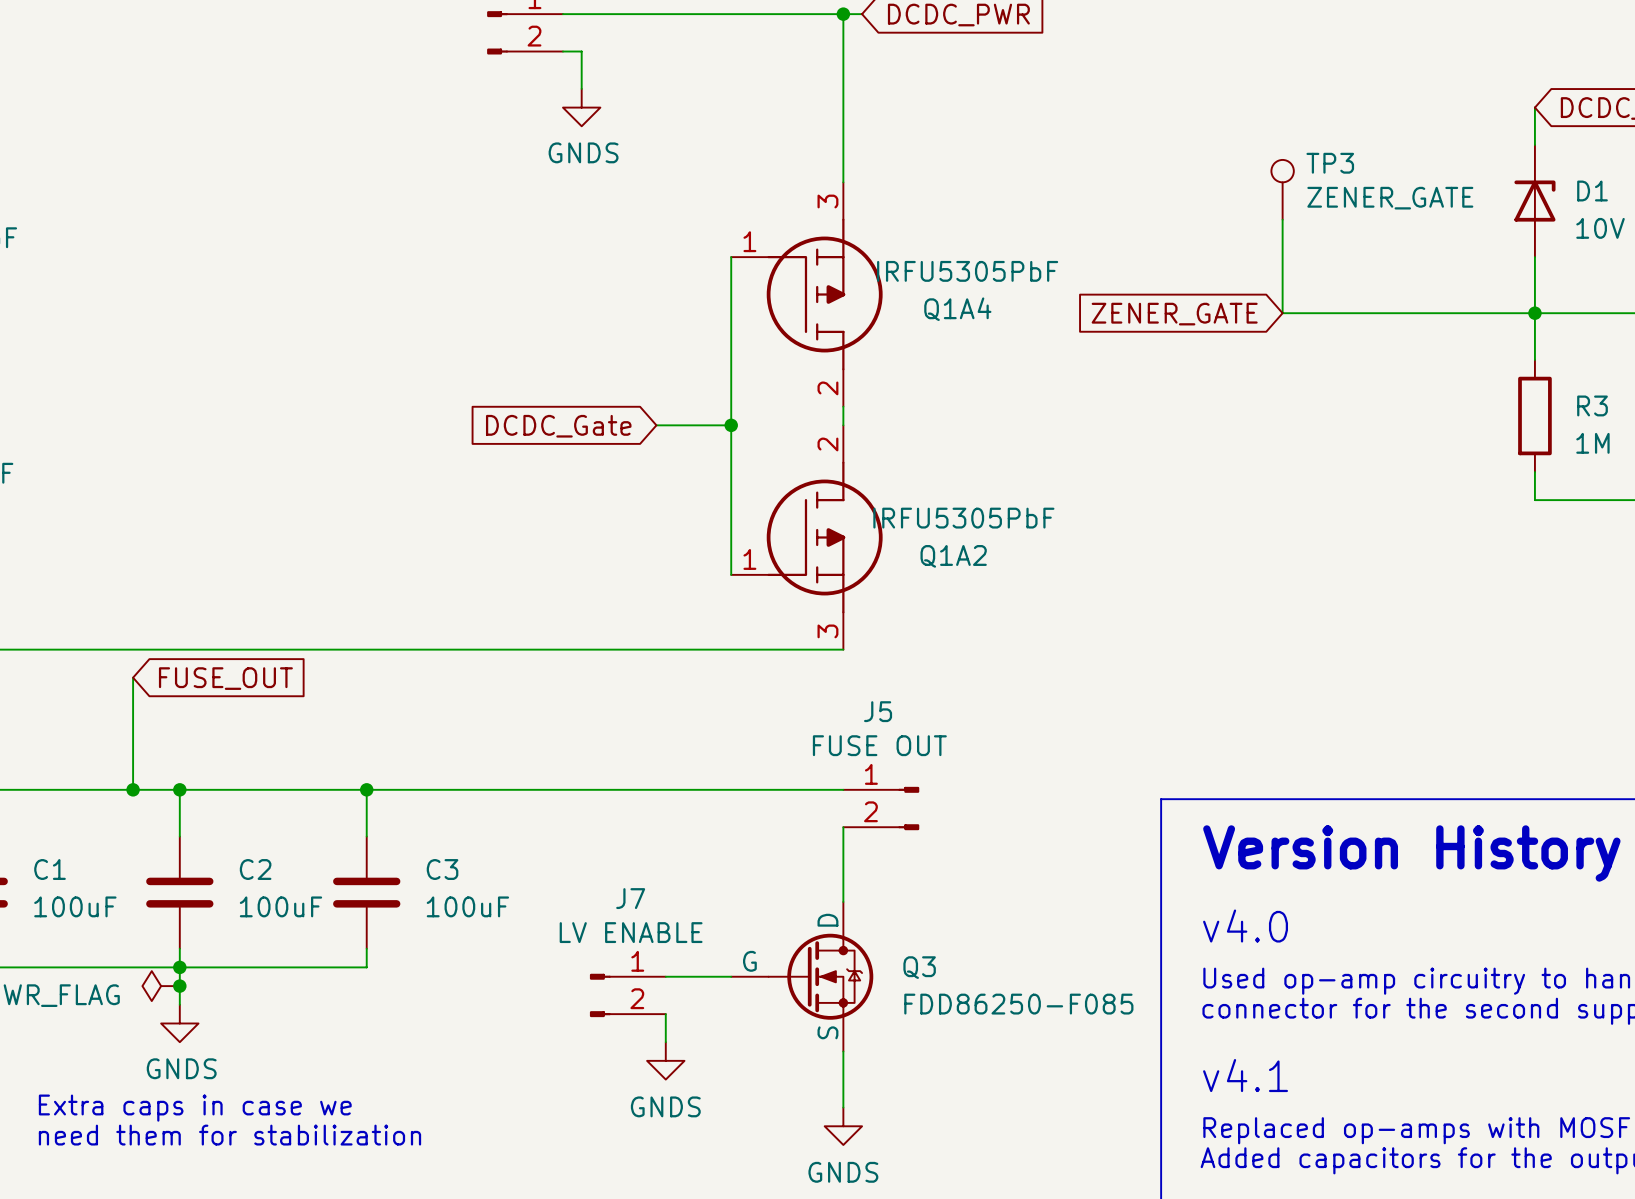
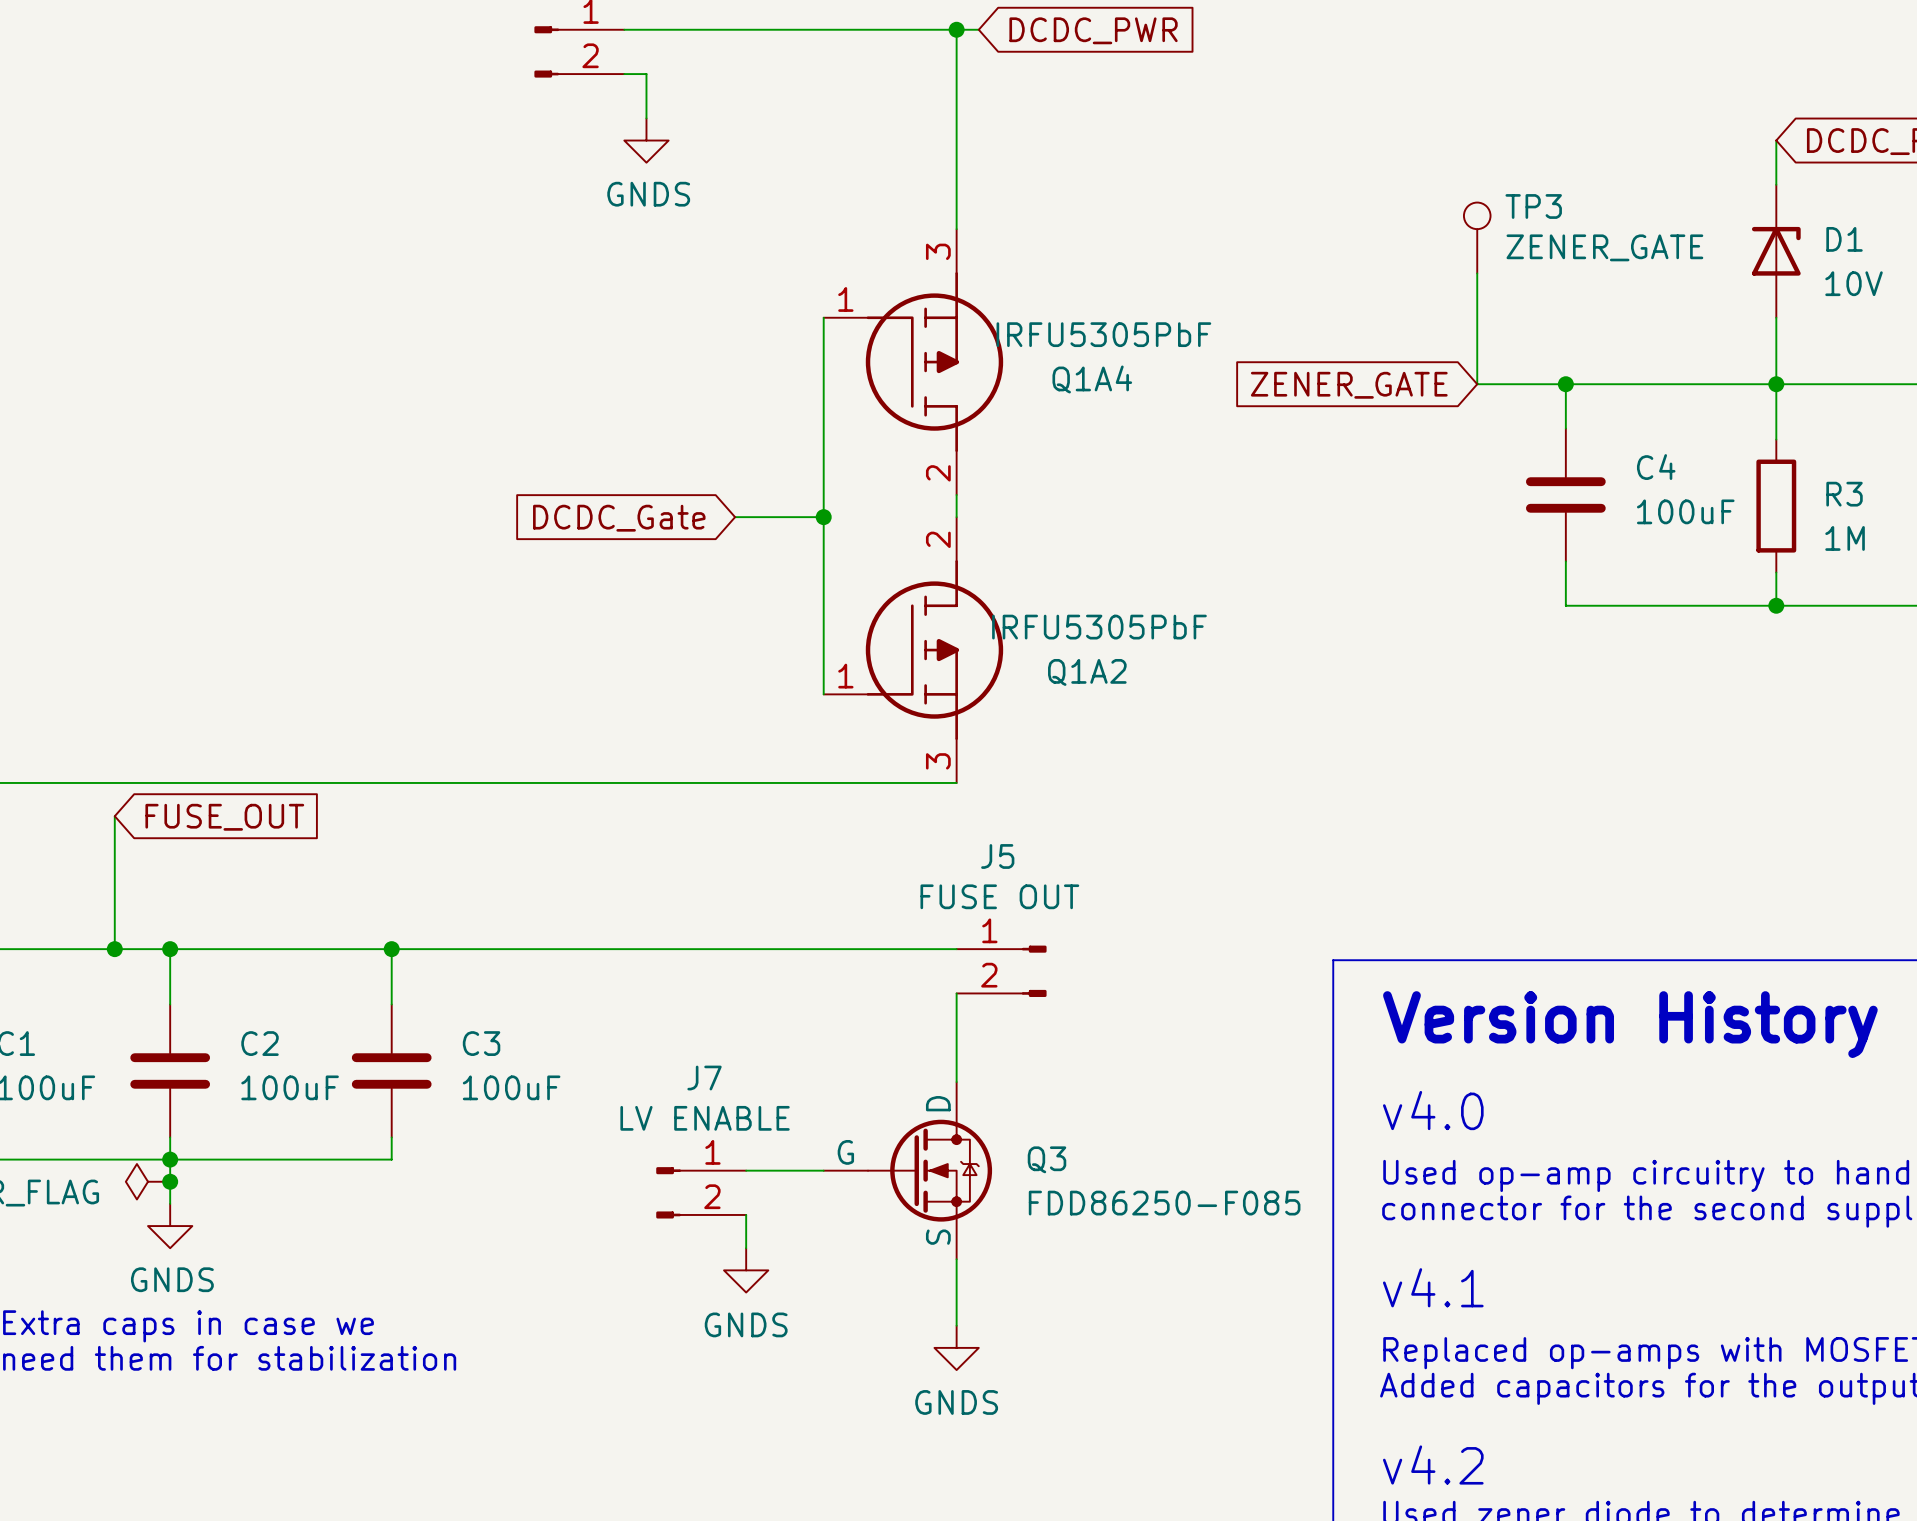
wire: none -> (1565, 384) (1565, 428)
junction: none -> (1565, 384)
C4: none -> 100uF (1565, 494)
wire: none -> (1565, 561) (1565, 605) (1776, 605)
junction: none -> (1776, 605)

